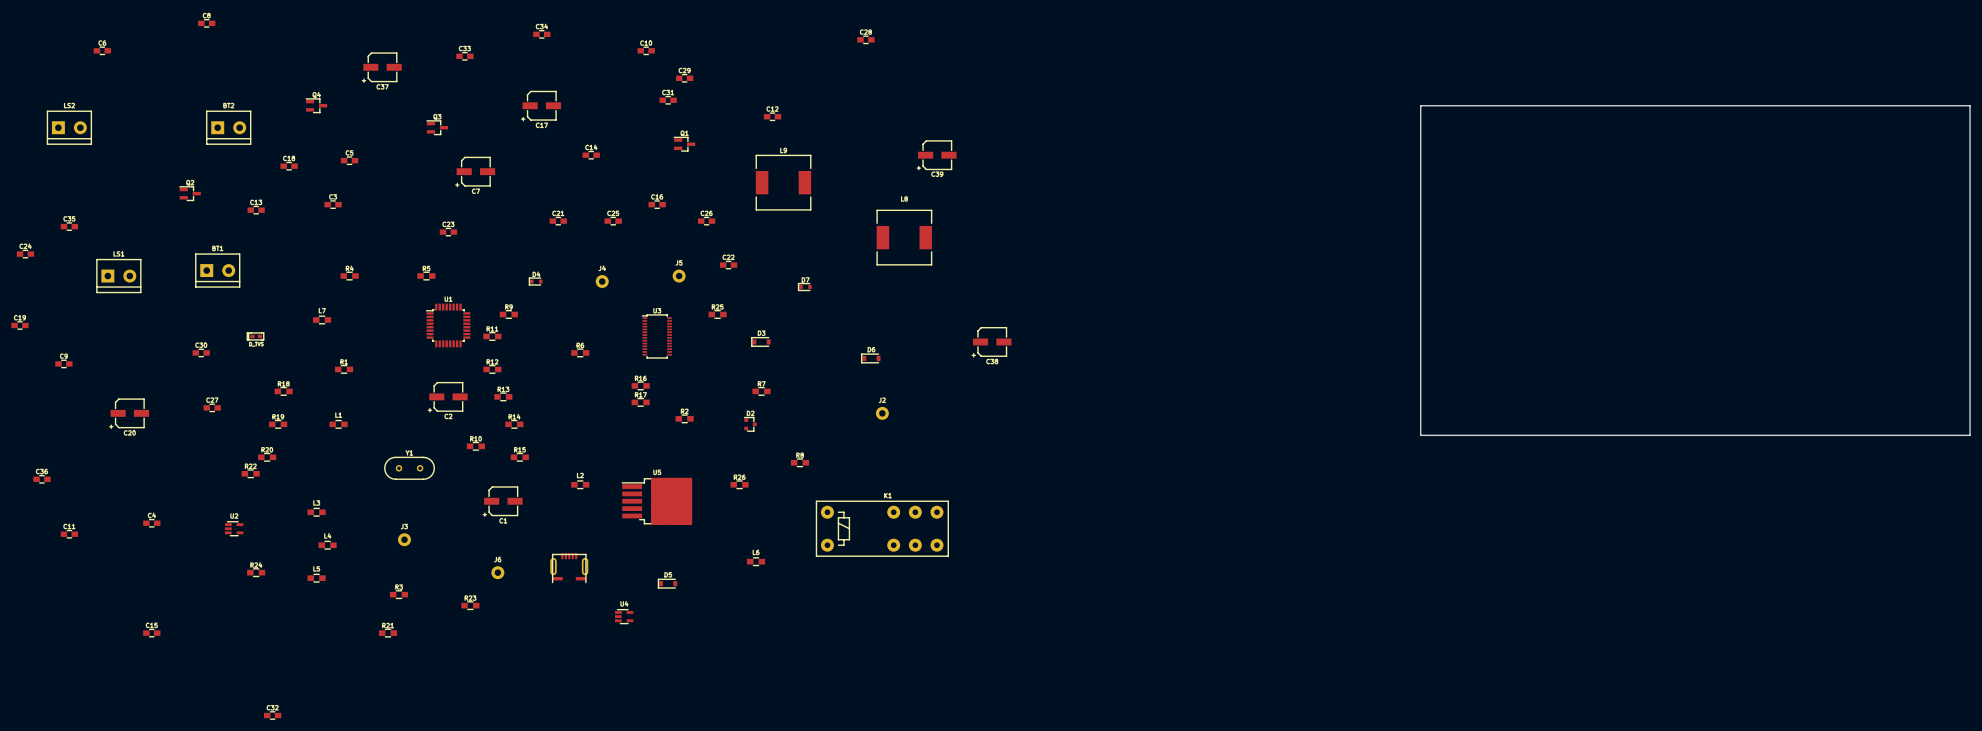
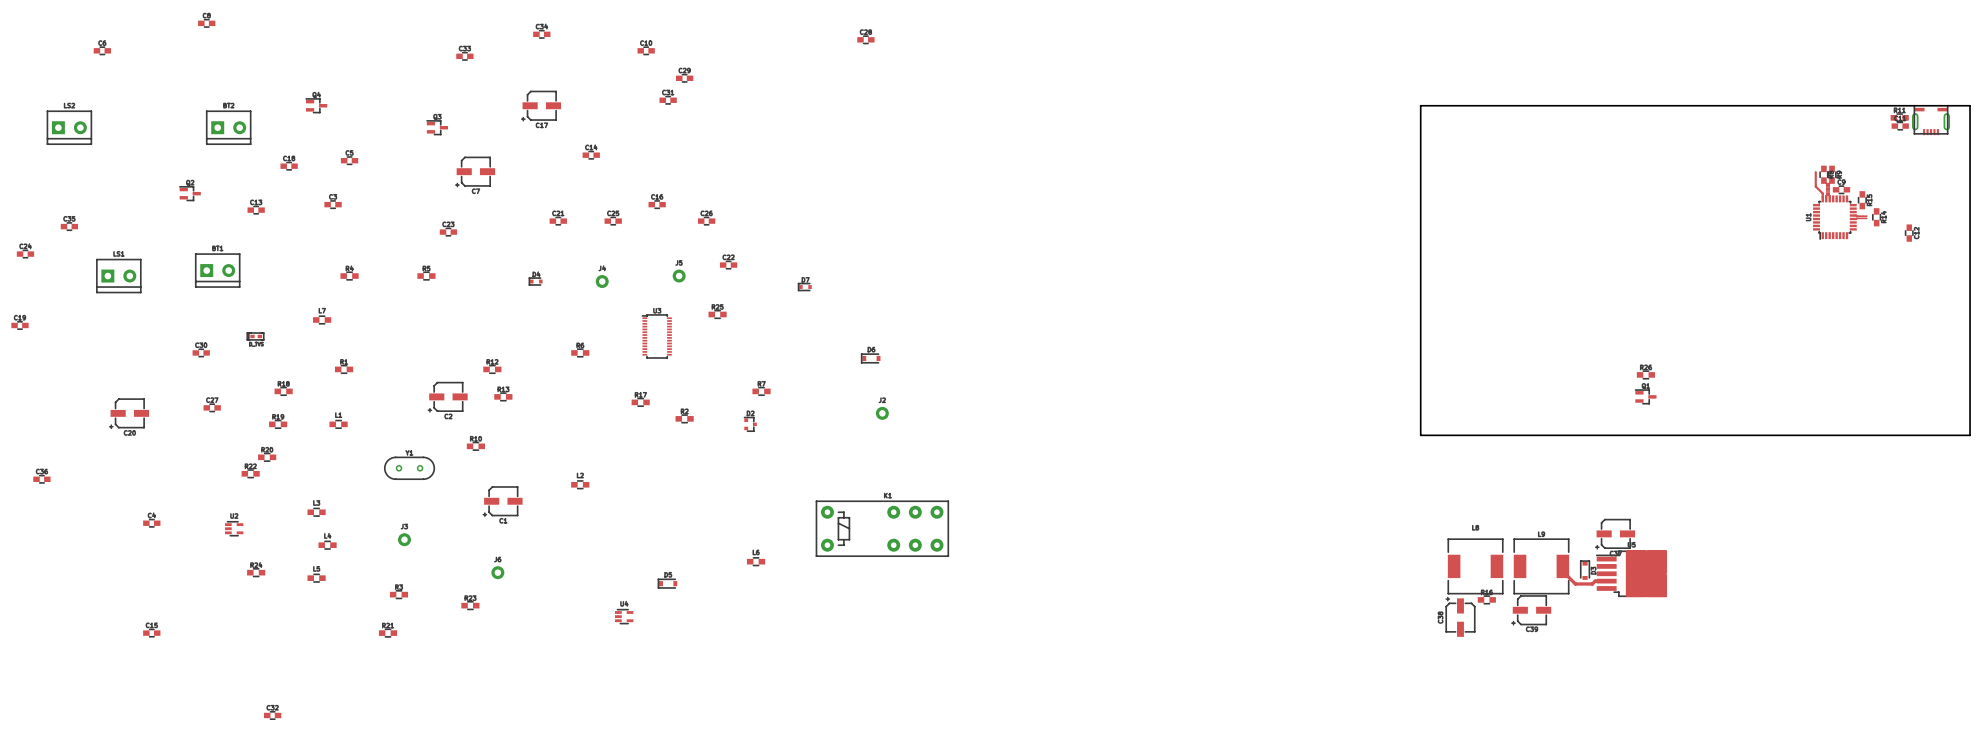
part position: (382, 67) -> (1615, 533)
part rotation: 0° (772, 116) -> 90° clockwise (1909, 233)
part position: (772, 116) -> (1909, 233)
part: none -> (1931, 120)
part position: (684, 144) -> (1645, 396)
part position: (937, 155) -> (1532, 610)
top track: none -> (1815, 172) (1815, 186) (1822, 193) (1822, 198)
top track: none -> (1823, 180) (1826, 183) (1826, 198)
top track: none -> (1832, 180) (1828, 183) (1829, 198)
part position: (783, 182) -> (1541, 566)
top track: none -> (1853, 215) (1866, 216)
top track: none -> (1866, 218) (1853, 218)
part position: (904, 237) -> (1475, 566)
part rotation: 0° (508, 314) -> 90° clockwise (1832, 174)
part position: (508, 314) -> (1832, 174)
part rotation: 0° (448, 325) -> 90° counterclockwise (1834, 217)
part position: (448, 325) -> (1834, 217)
part position: (492, 336) -> (1899, 117)
part rotation: 0° (761, 341) -> 90° clockwise (1585, 570)
part position: (761, 341) -> (1585, 570)
part rotation: 0° (992, 341) -> 90° clockwise (1460, 617)
part position: (992, 341) -> (1460, 617)
part position: (63, 363) -> (1841, 189)
part position: (640, 385) -> (1486, 599)
part rotation: 0° (514, 424) -> 90° clockwise (1876, 217)
part position: (514, 424) -> (1876, 217)
part rotation: 0° (519, 457) -> 90° clockwise (1862, 200)
part position: (519, 457) -> (1862, 200)
part rotation: 0° (799, 462) -> 90° clockwise (1823, 174)
part position: (799, 462) -> (1823, 174)
part position: (739, 484) -> (1645, 374)
part position: (657, 501) -> (1631, 573)
part position: (69, 534) -> (1900, 126)
top track: none -> (1562, 566) (1562, 571) (1575, 583) (1592, 583) (1595, 581) (1606, 581)
part: (569, 568) -> none

